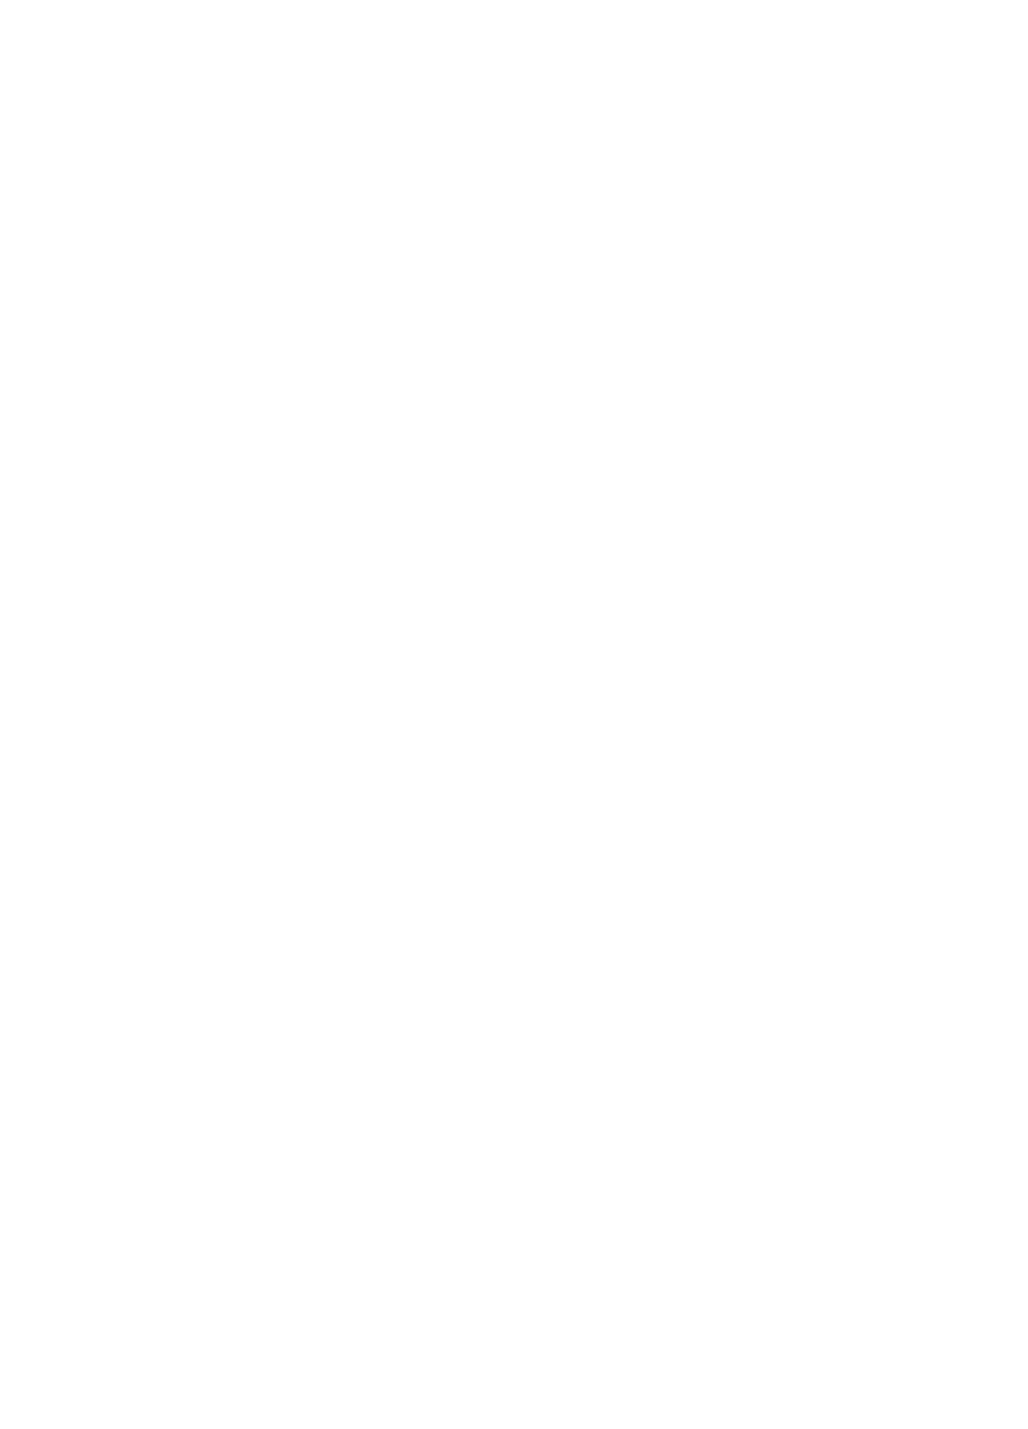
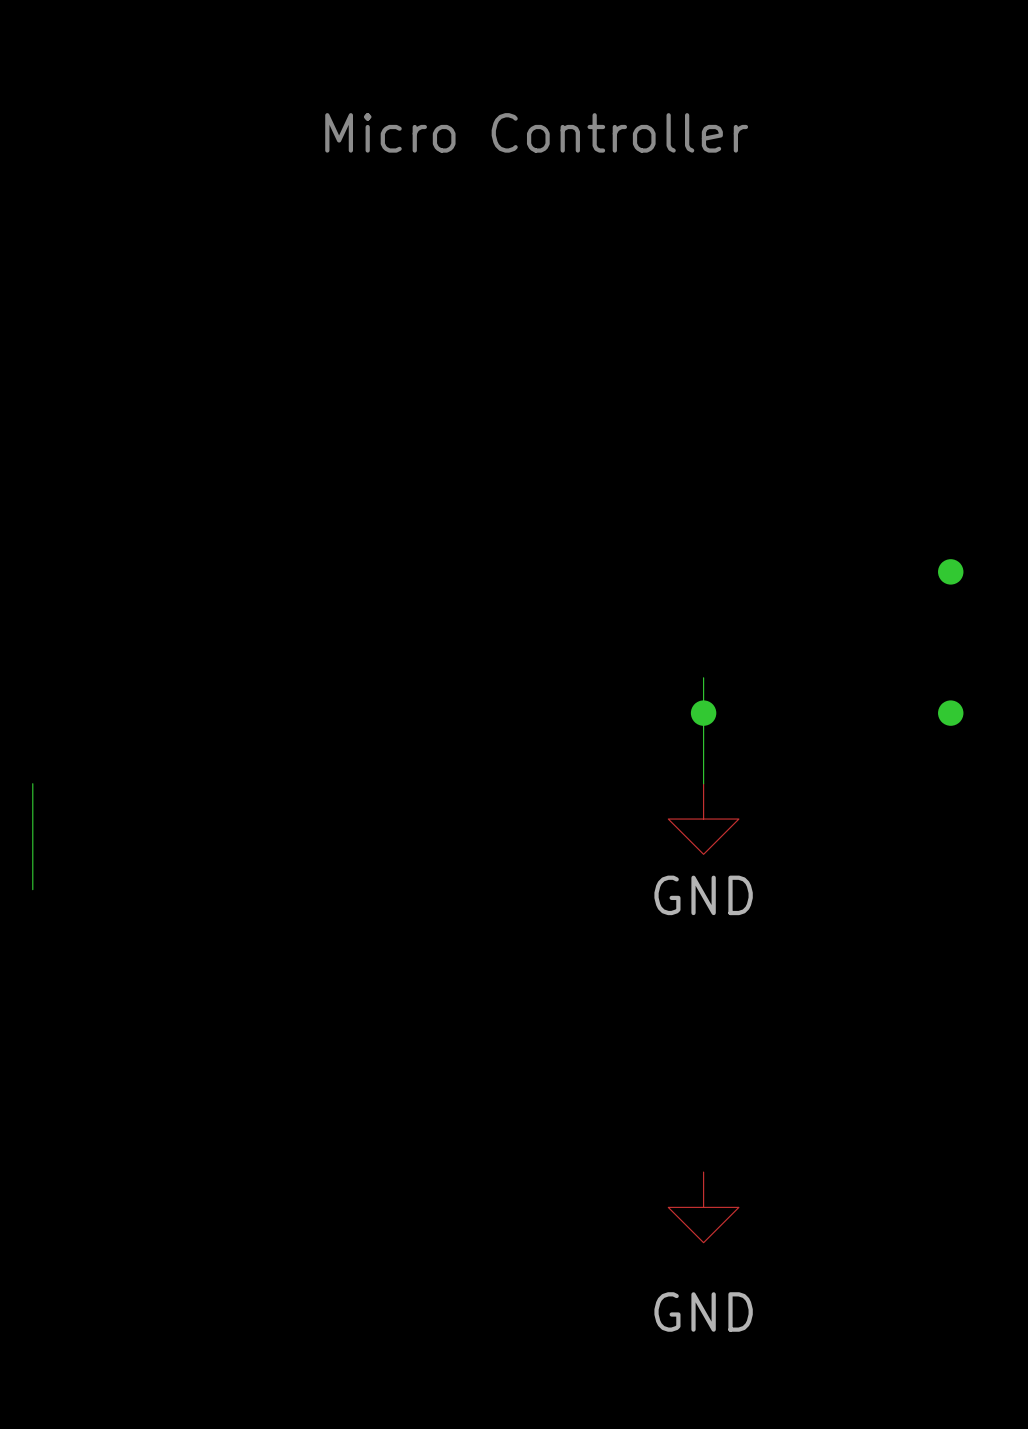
text: none -> Micro Controller (536, 132)
junction: none -> (950, 571)
wire: none -> (703, 677) (703, 783)
junction: none -> (703, 713)
junction: none -> (950, 713)
wire: none -> (32, 783) (32, 889)
power symbol: none -> GND (703, 819)
power symbol: none -> GND (703, 1207)

